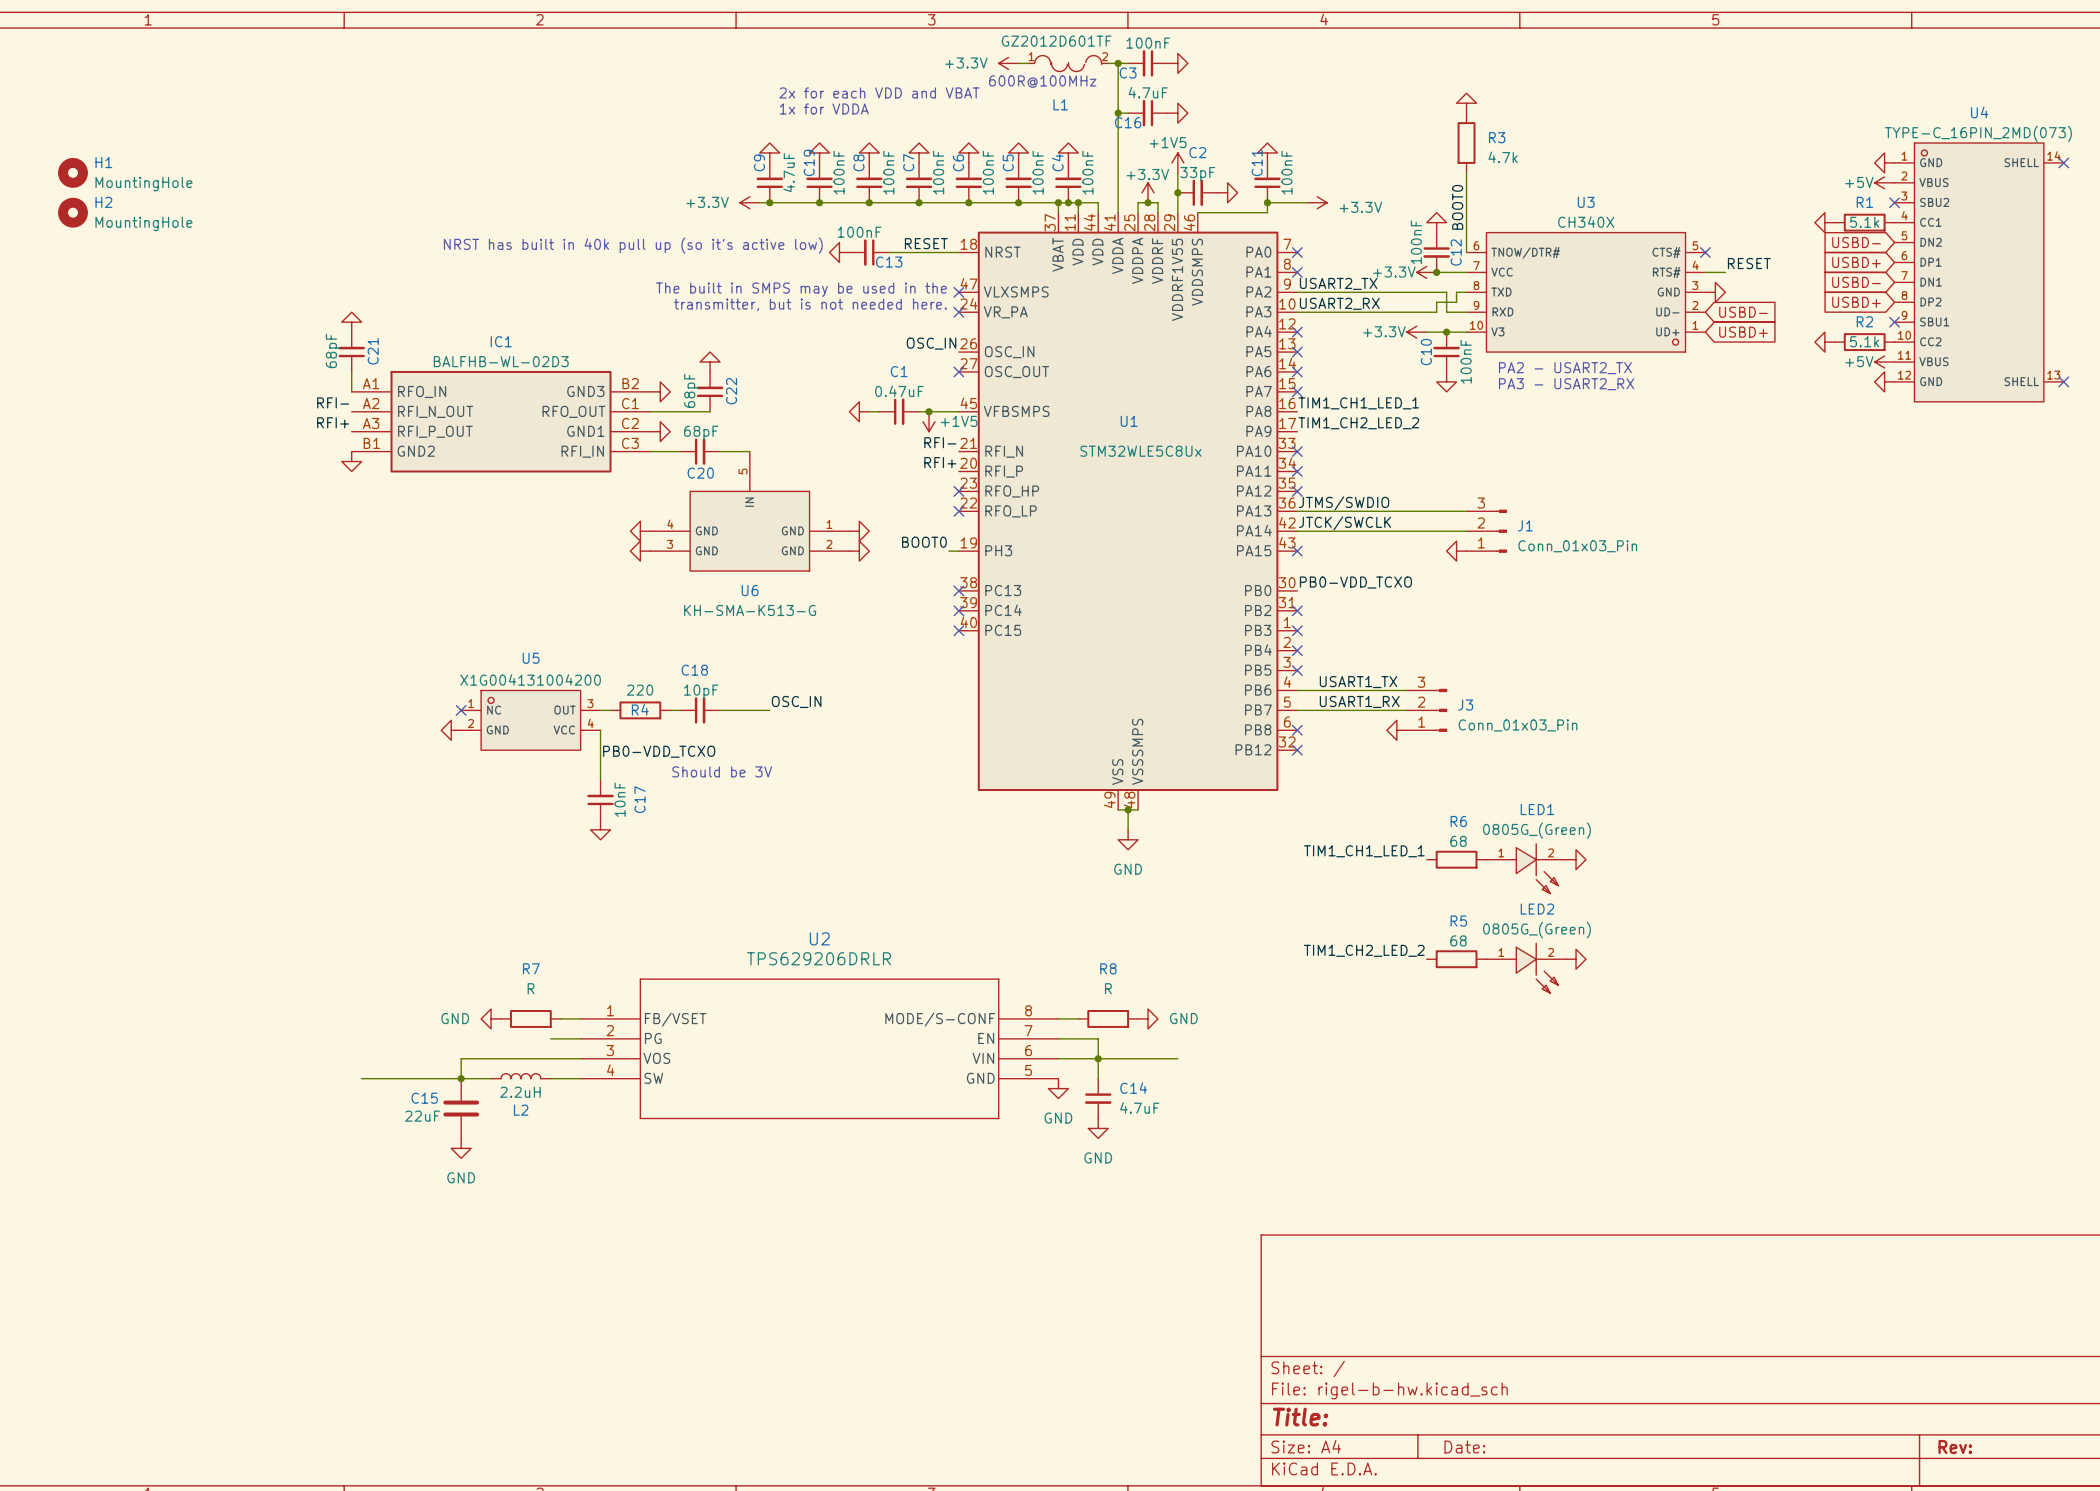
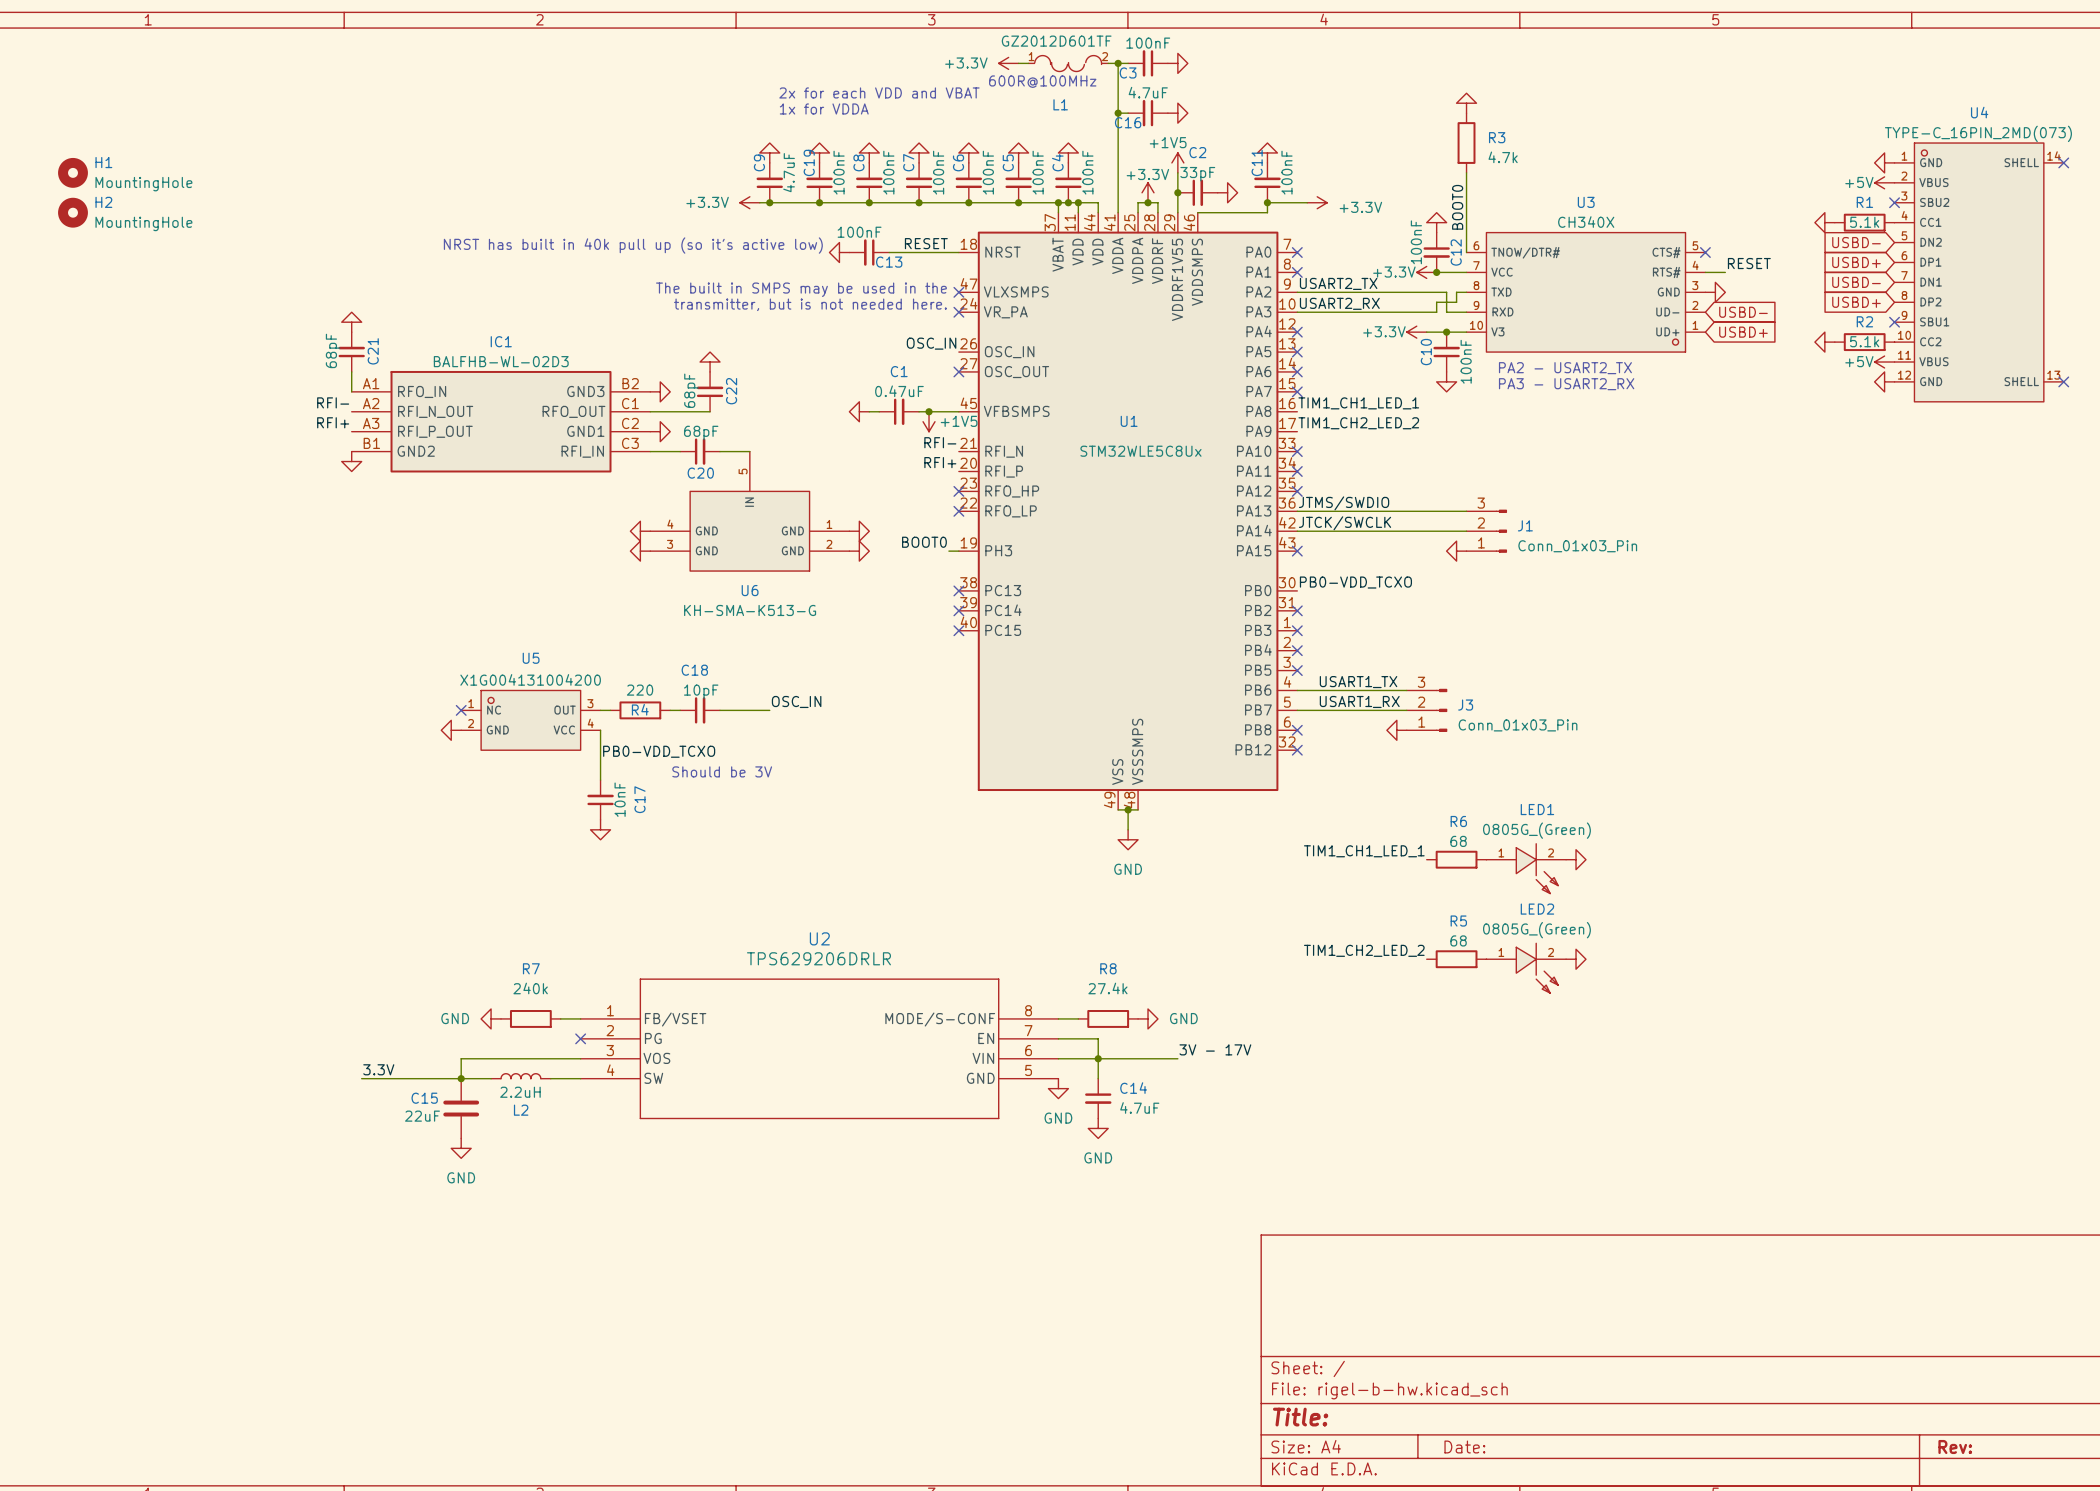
R7 value: R (531, 988) -> 240k (530, 988)
R8 value: R (1108, 988) -> 27.4k (1107, 988)
wire: (550, 1038) (580, 1038) -> none
no-connect mark: none -> (580, 1038)
label: none -> 3V - 17V (1215, 1049)
label: none -> 3.3V (378, 1069)

